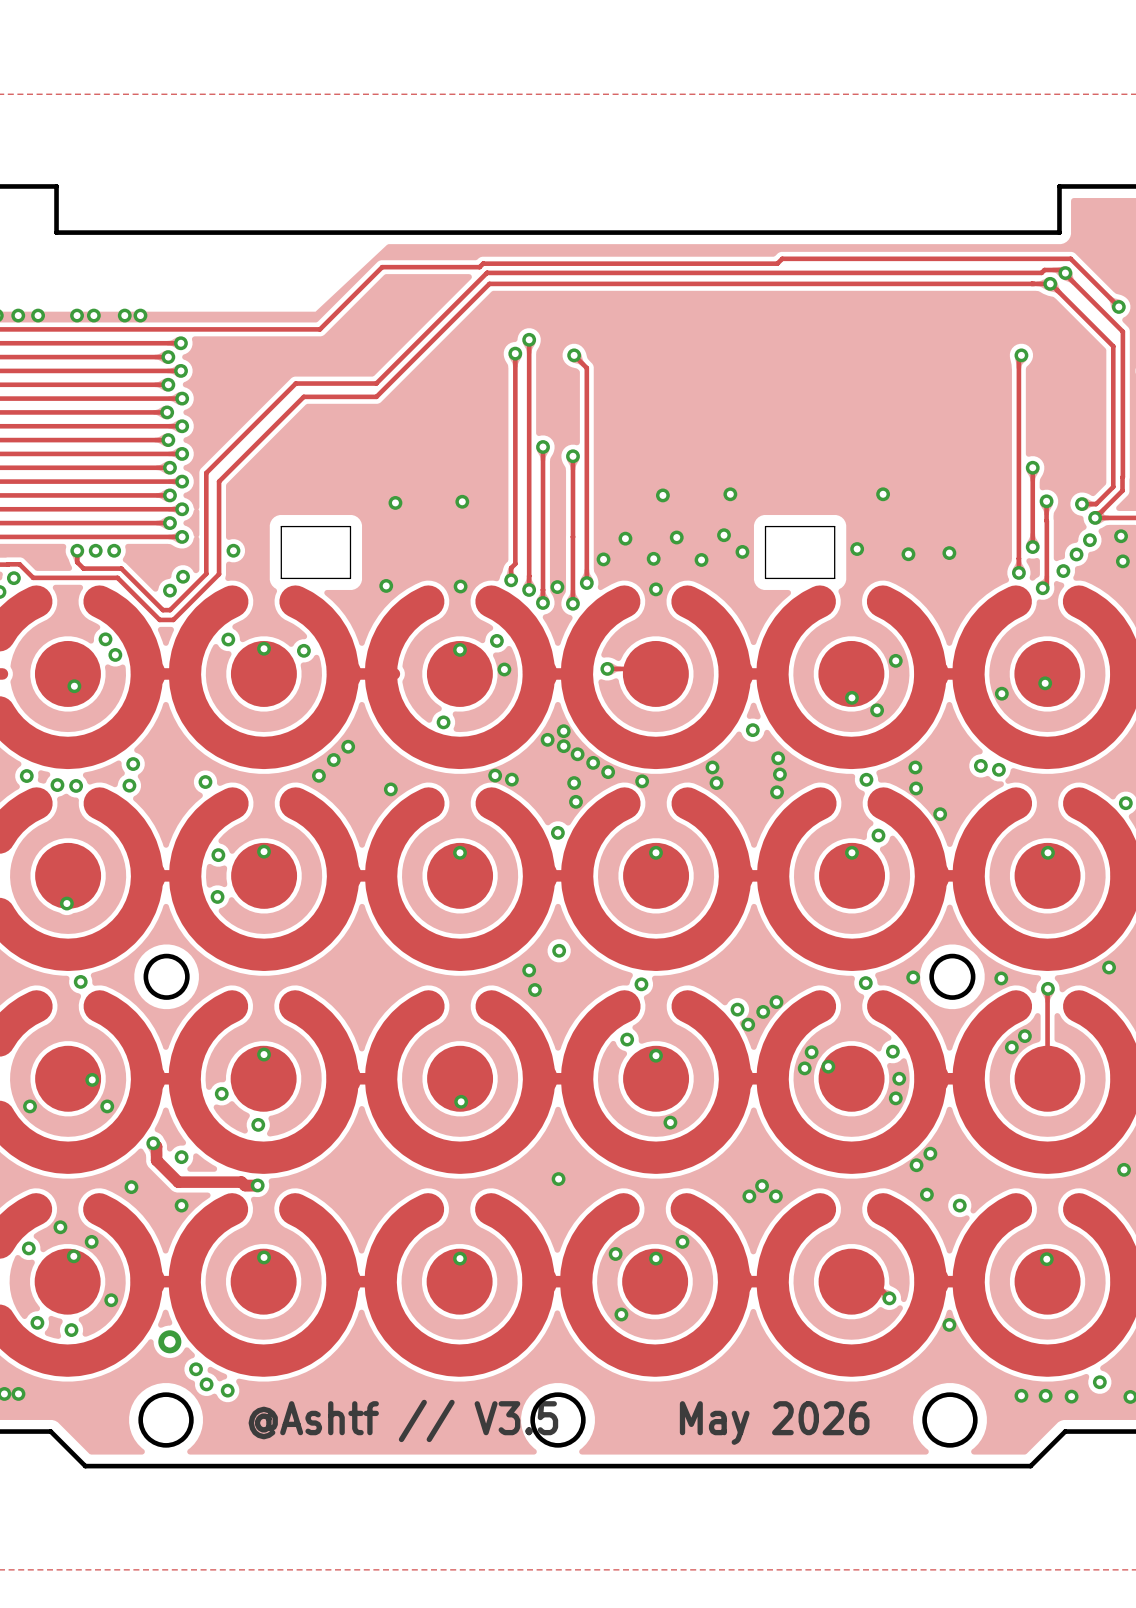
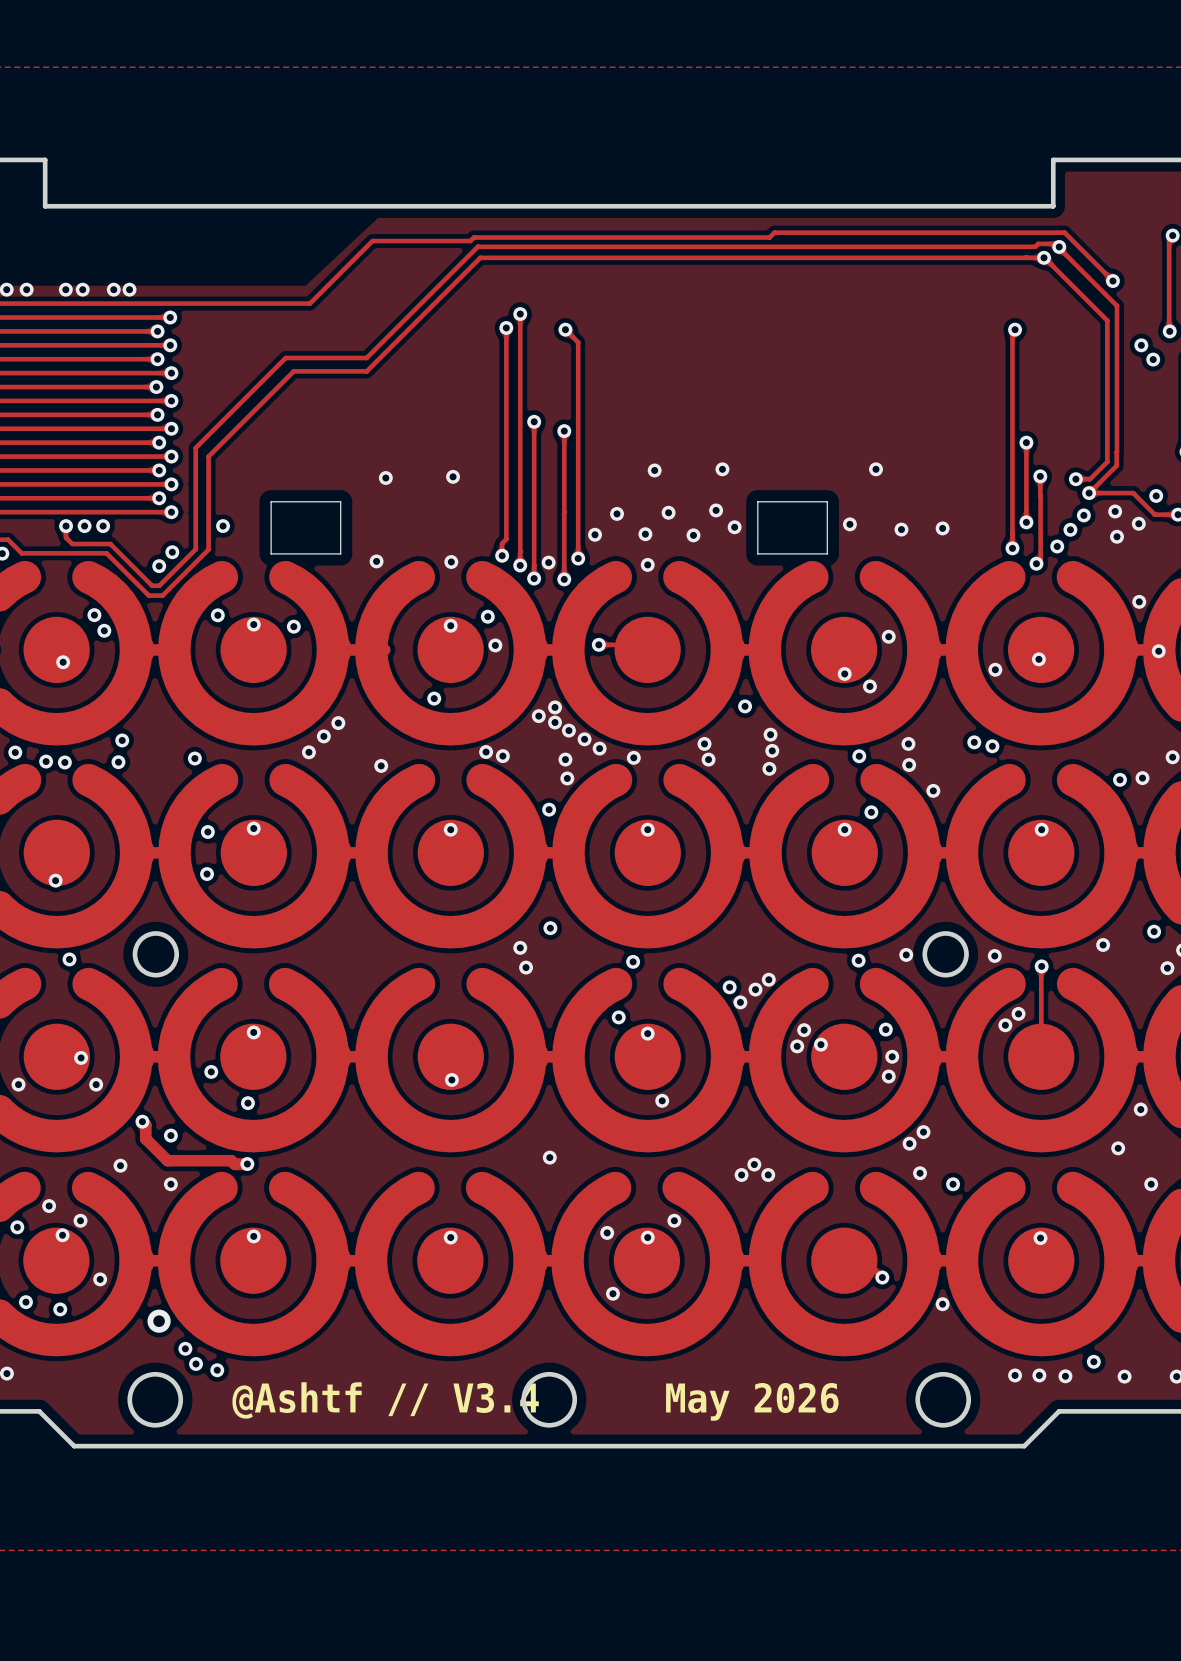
text: @Ashtf // V3.5 (403, 1420) -> @Ashtf // V3.4 (385, 1400)

